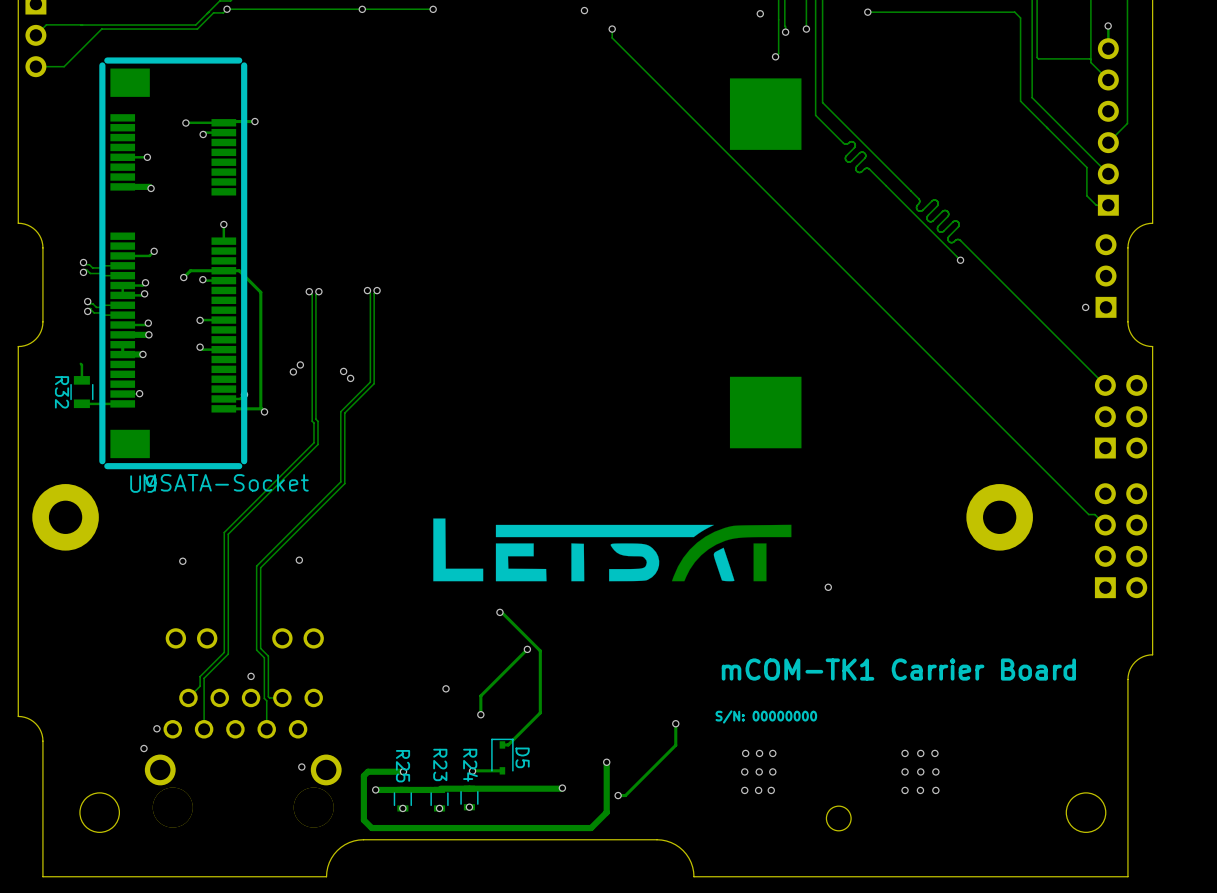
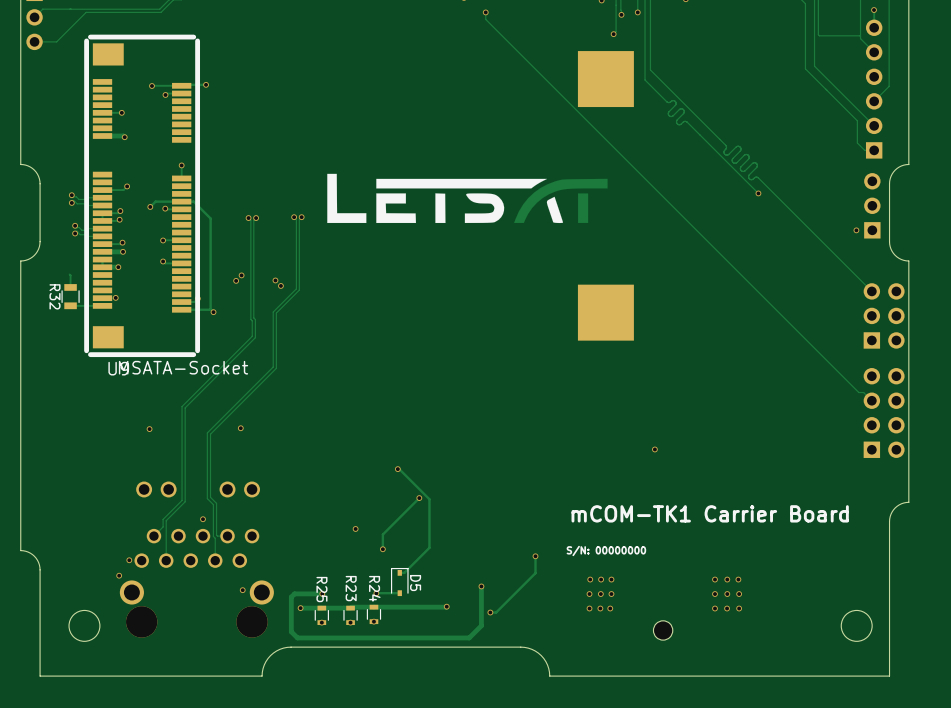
part: (65, 517) -> none
part: (999, 517) -> none
drawing position: (612, 549) -> (467, 198)

